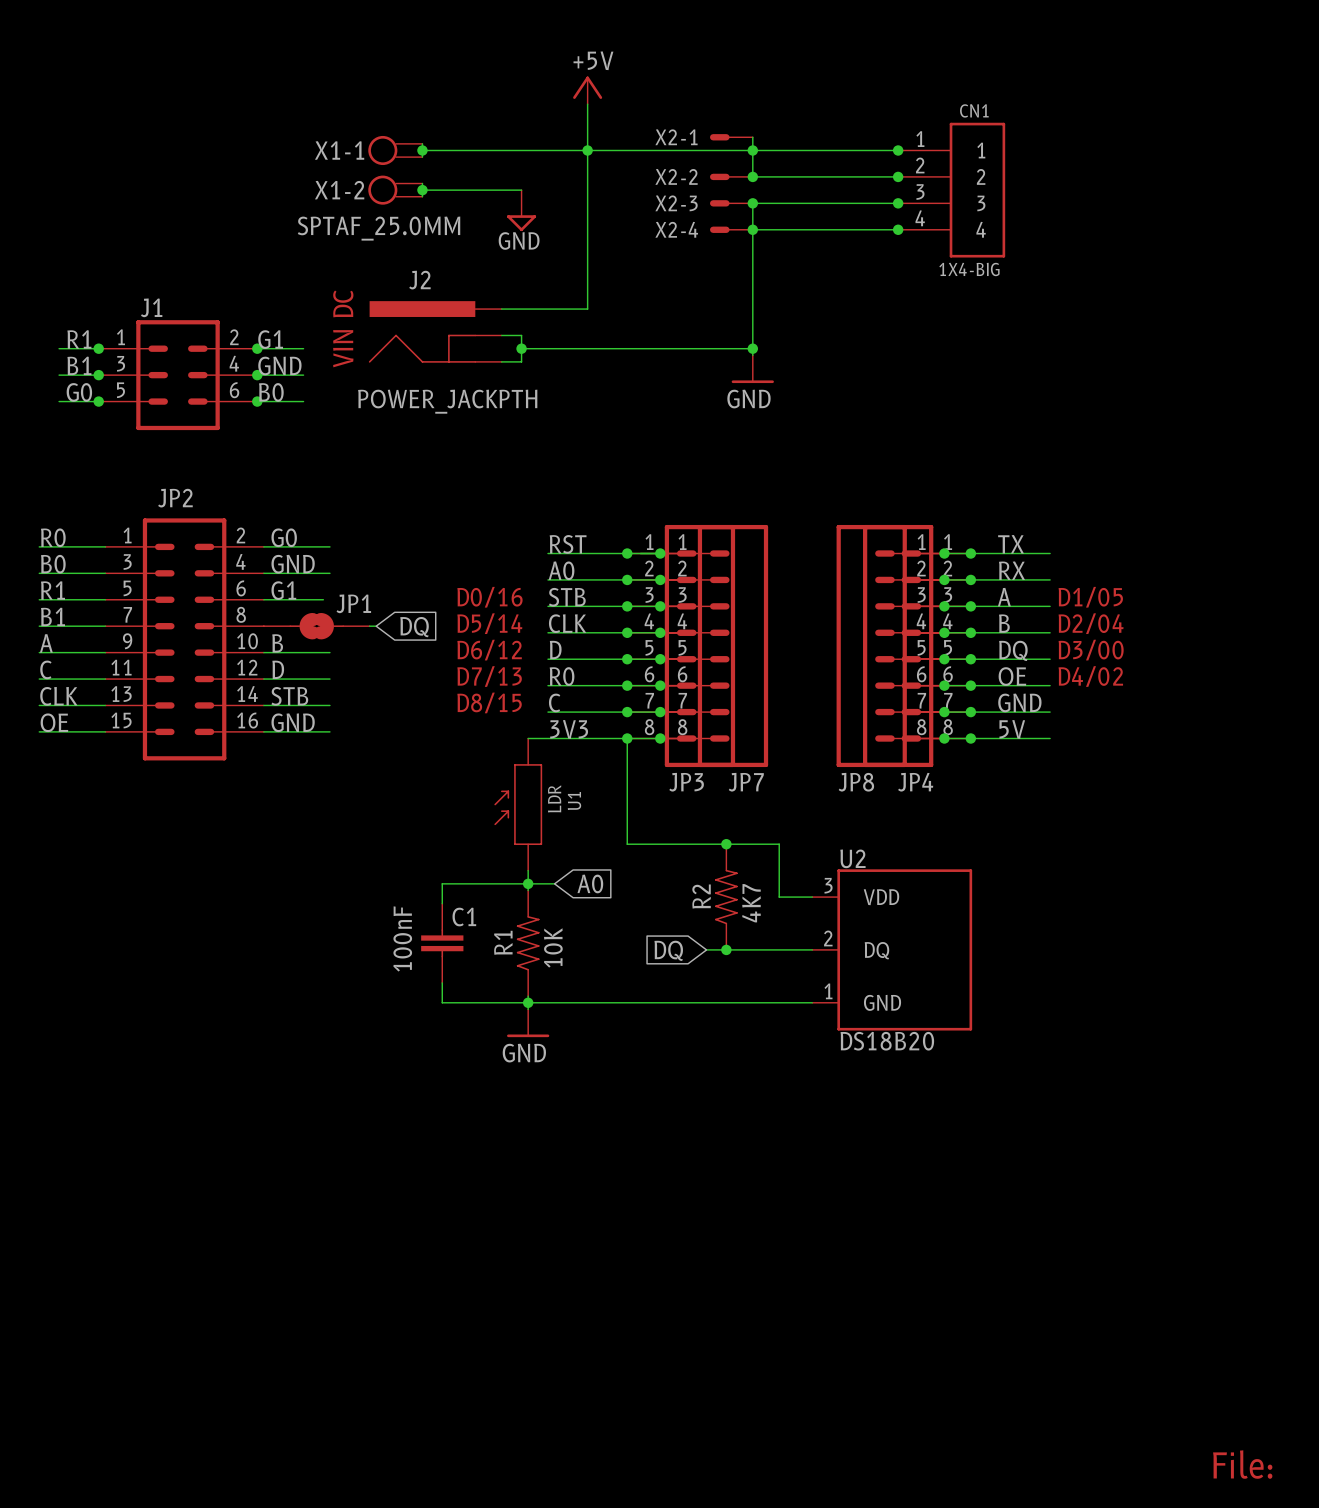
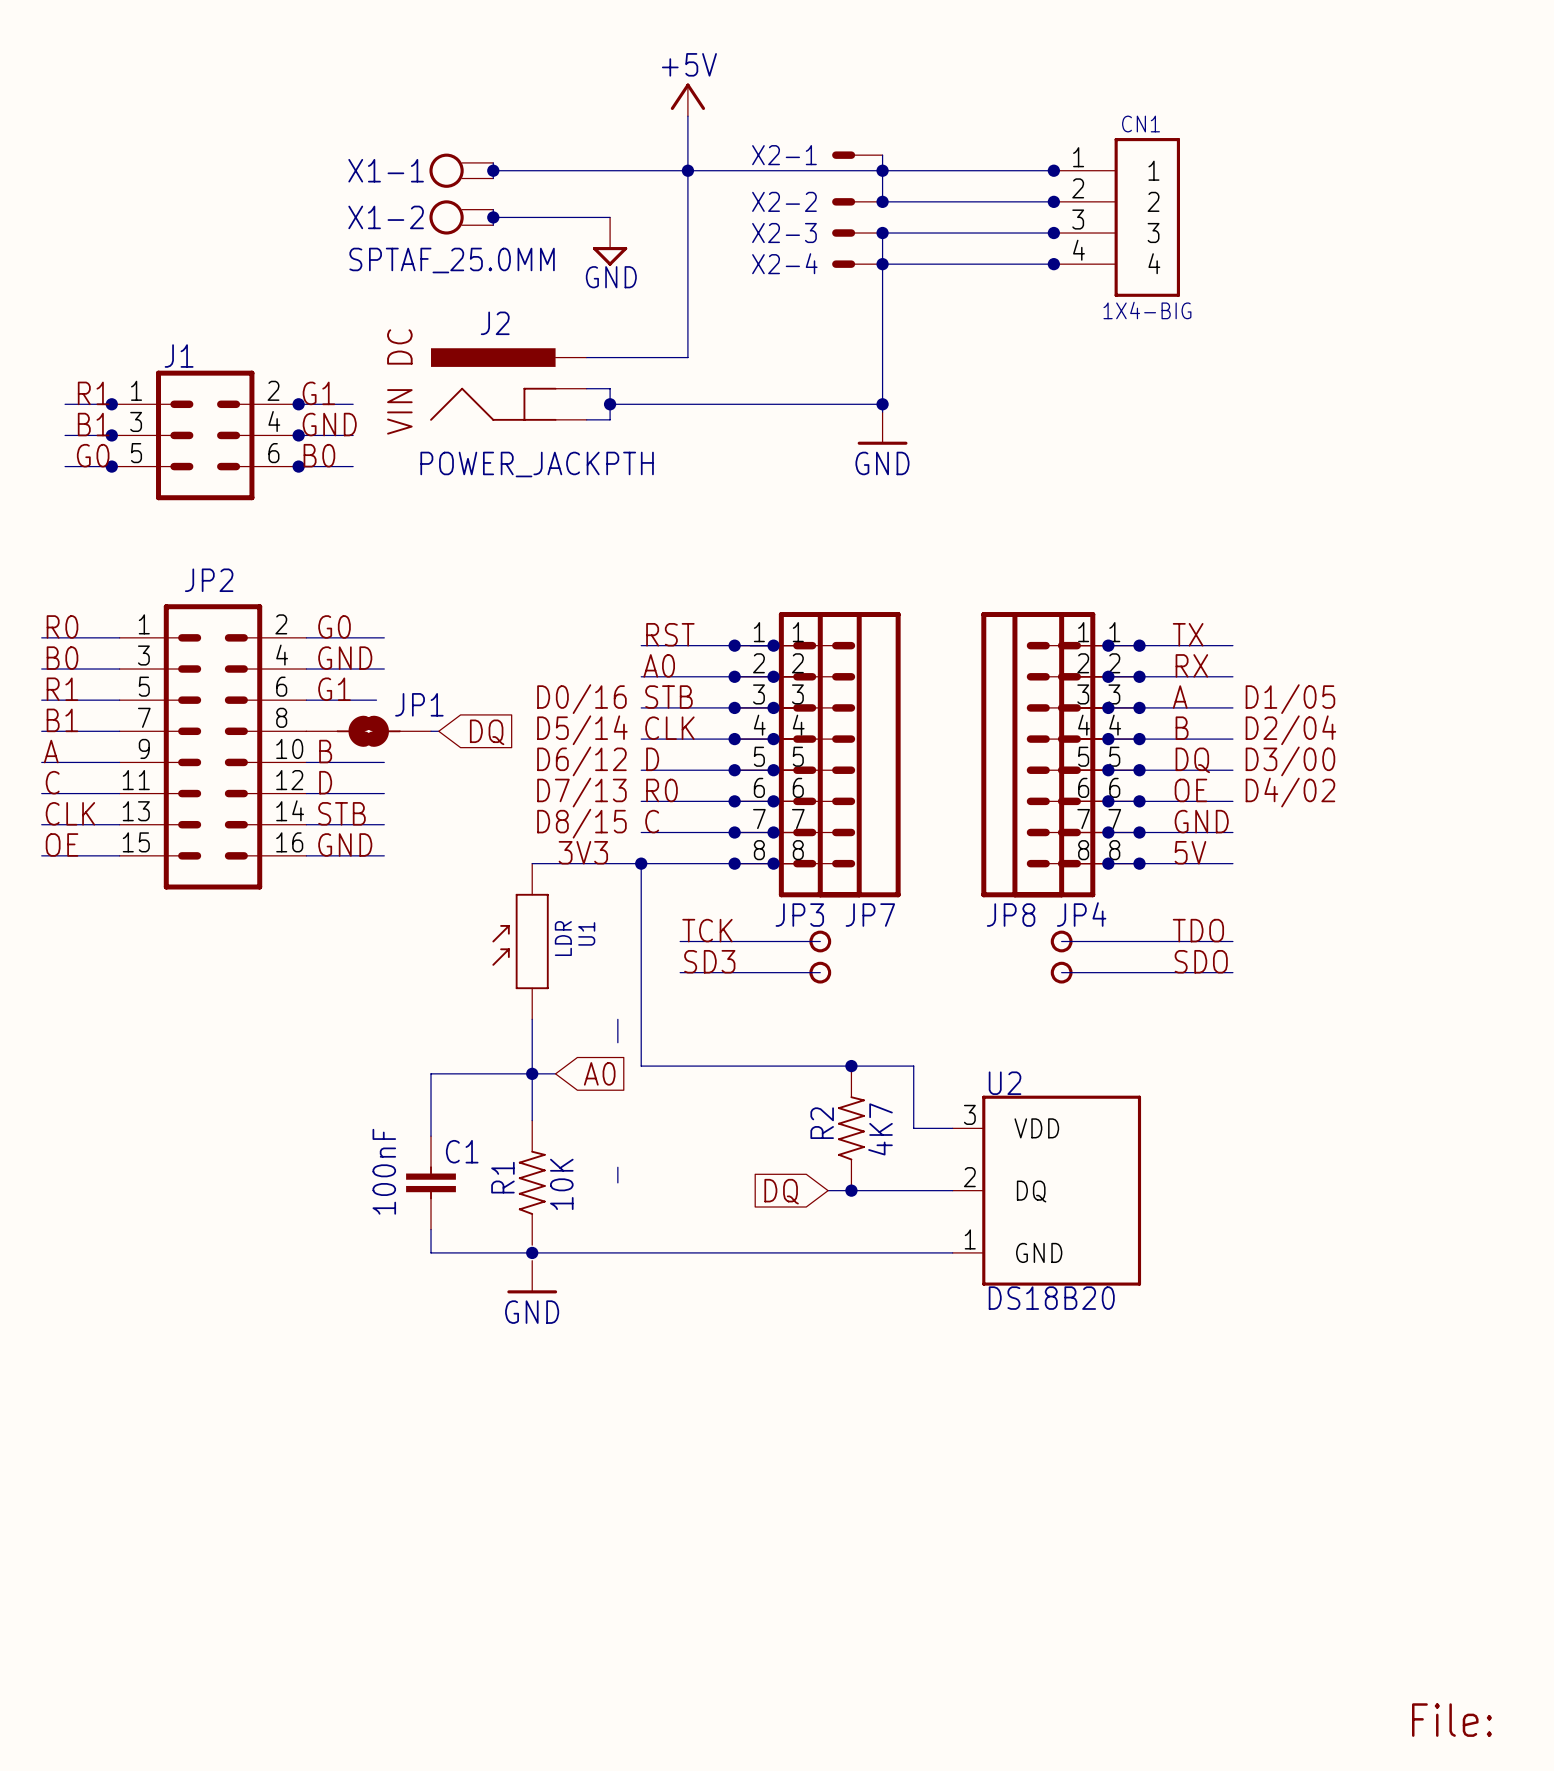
label position: 3V3 (569, 729) -> 3V3 (583, 852)
wire: none -> (532, 863) (617, 863)
wire: none -> (641, 863) (641, 1066) (913, 1066) (913, 1128) (952, 1128)
junction: none -> (641, 863)
wire: (627, 738) (627, 844) (779, 844) (779, 897) (812, 897) -> none
label: none -> TCK (707, 930)
label: none -> TDO (1198, 930)
U1 position: (518, 804) -> (520, 941)
wire: none -> (680, 941) (820, 941)
part: none -> (820, 941)
wire: none -> (1061, 941) (1232, 941)
part: none -> (1061, 941)
label: none -> SD3 (709, 961)
label: none -> SDO (1201, 961)
wire: none -> (680, 972) (820, 972)
part: none -> (820, 972)
wire: none -> (1061, 972) (1232, 972)
part: none -> (1061, 972)
junction: (726, 844) -> none
wire: none -> (532, 1019) (532, 1120)
junction: (528, 883) -> none
wire: (554, 883) (442, 883) (442, 903) -> none
global label position: A0 (590, 883) -> A0 (599, 1073)
R2 position: (726, 897) -> (851, 1128)
junction: none -> (851, 1066)
junction: none -> (532, 1073)
wire: none -> (555, 1073) (431, 1073) (431, 1136)
C1 position: (442, 943) -> (431, 1182)
R1 position: (528, 943) -> (532, 1182)
wire: (706, 949) (812, 949) -> (828, 1190) (952, 1190)
junction: (726, 949) -> none
U2 position: (892, 949) -> (1046, 1190)
global label position: DQ (668, 950) -> DQ (781, 1191)
wire: (442, 982) (442, 1002) (812, 1002) -> none
junction: (528, 1002) -> none
junction: none -> (851, 1190)
power symbol position: GND (528, 1023) -> GND (532, 1277)
wire: none -> (431, 1229) (431, 1252) (952, 1252)
junction: none -> (532, 1252)

